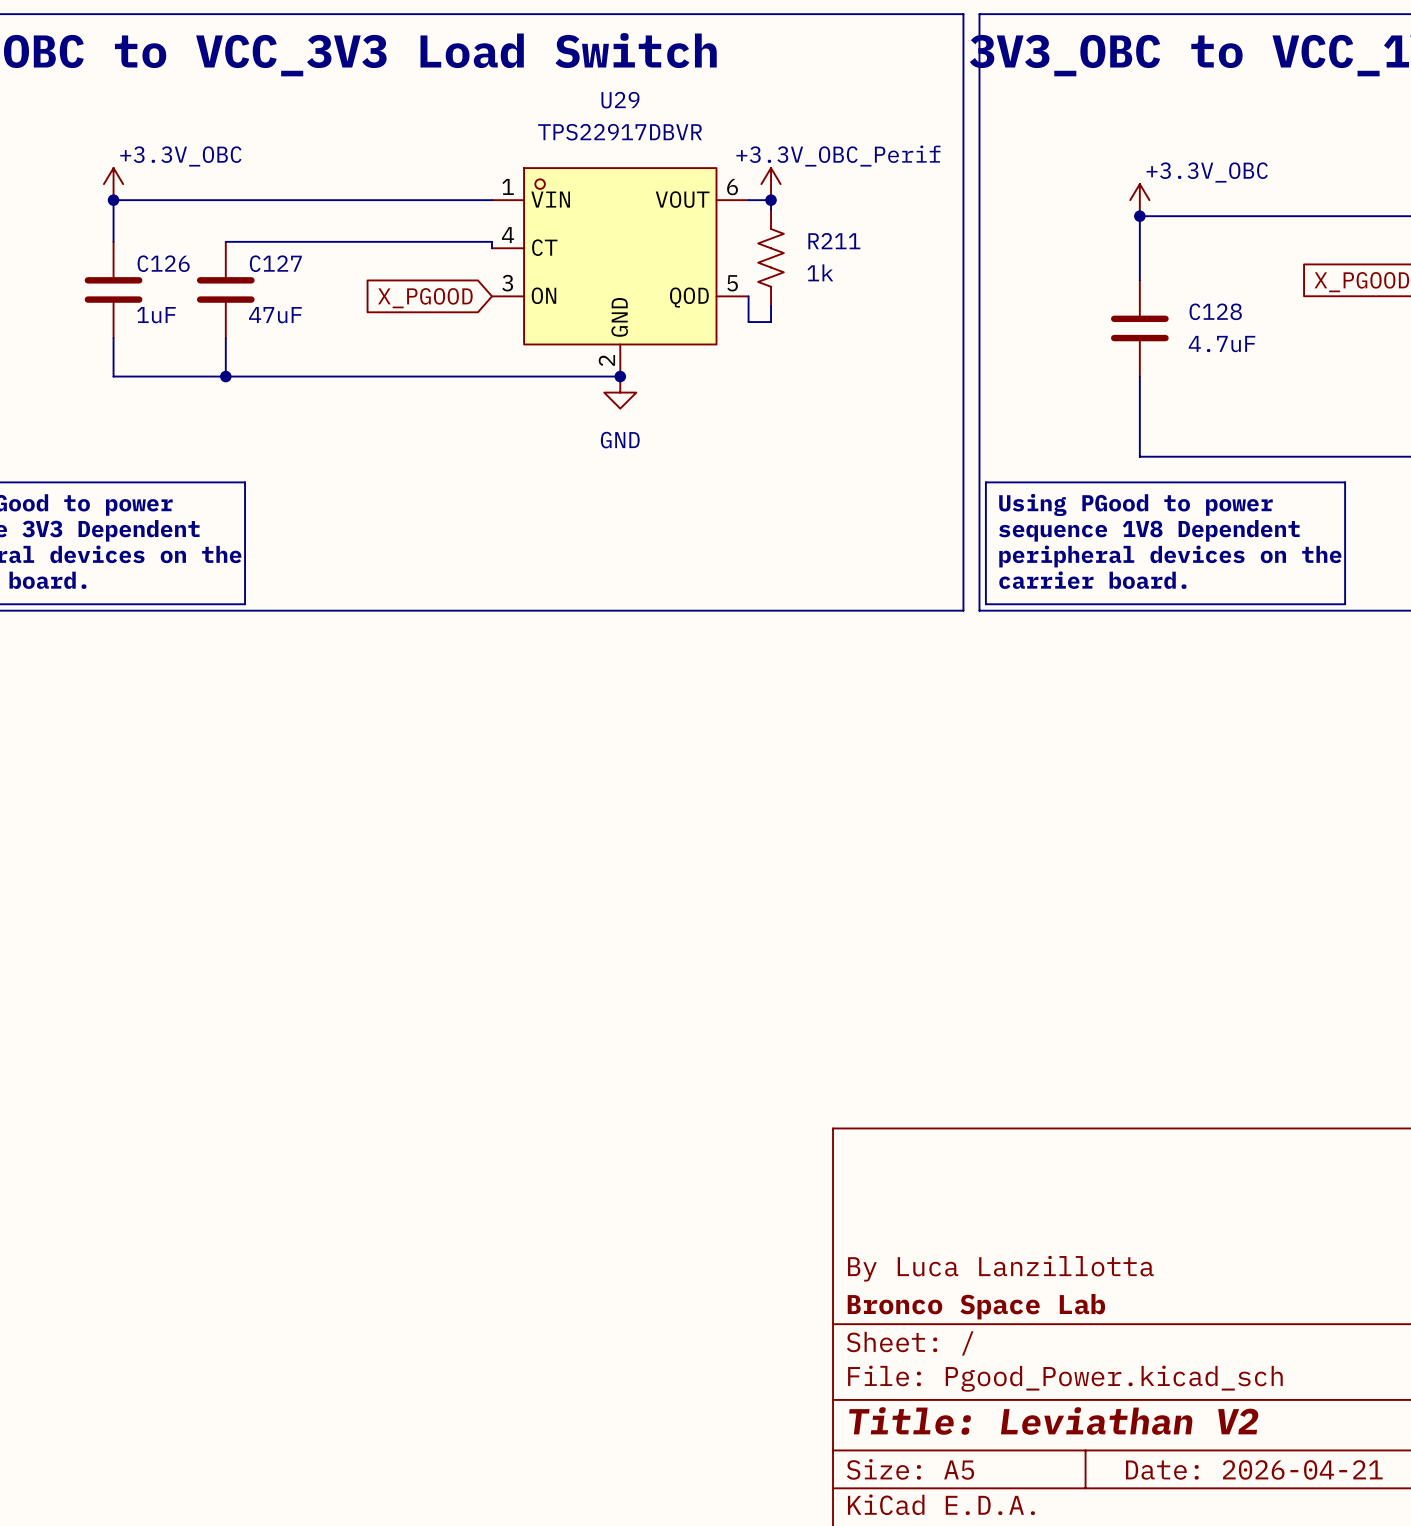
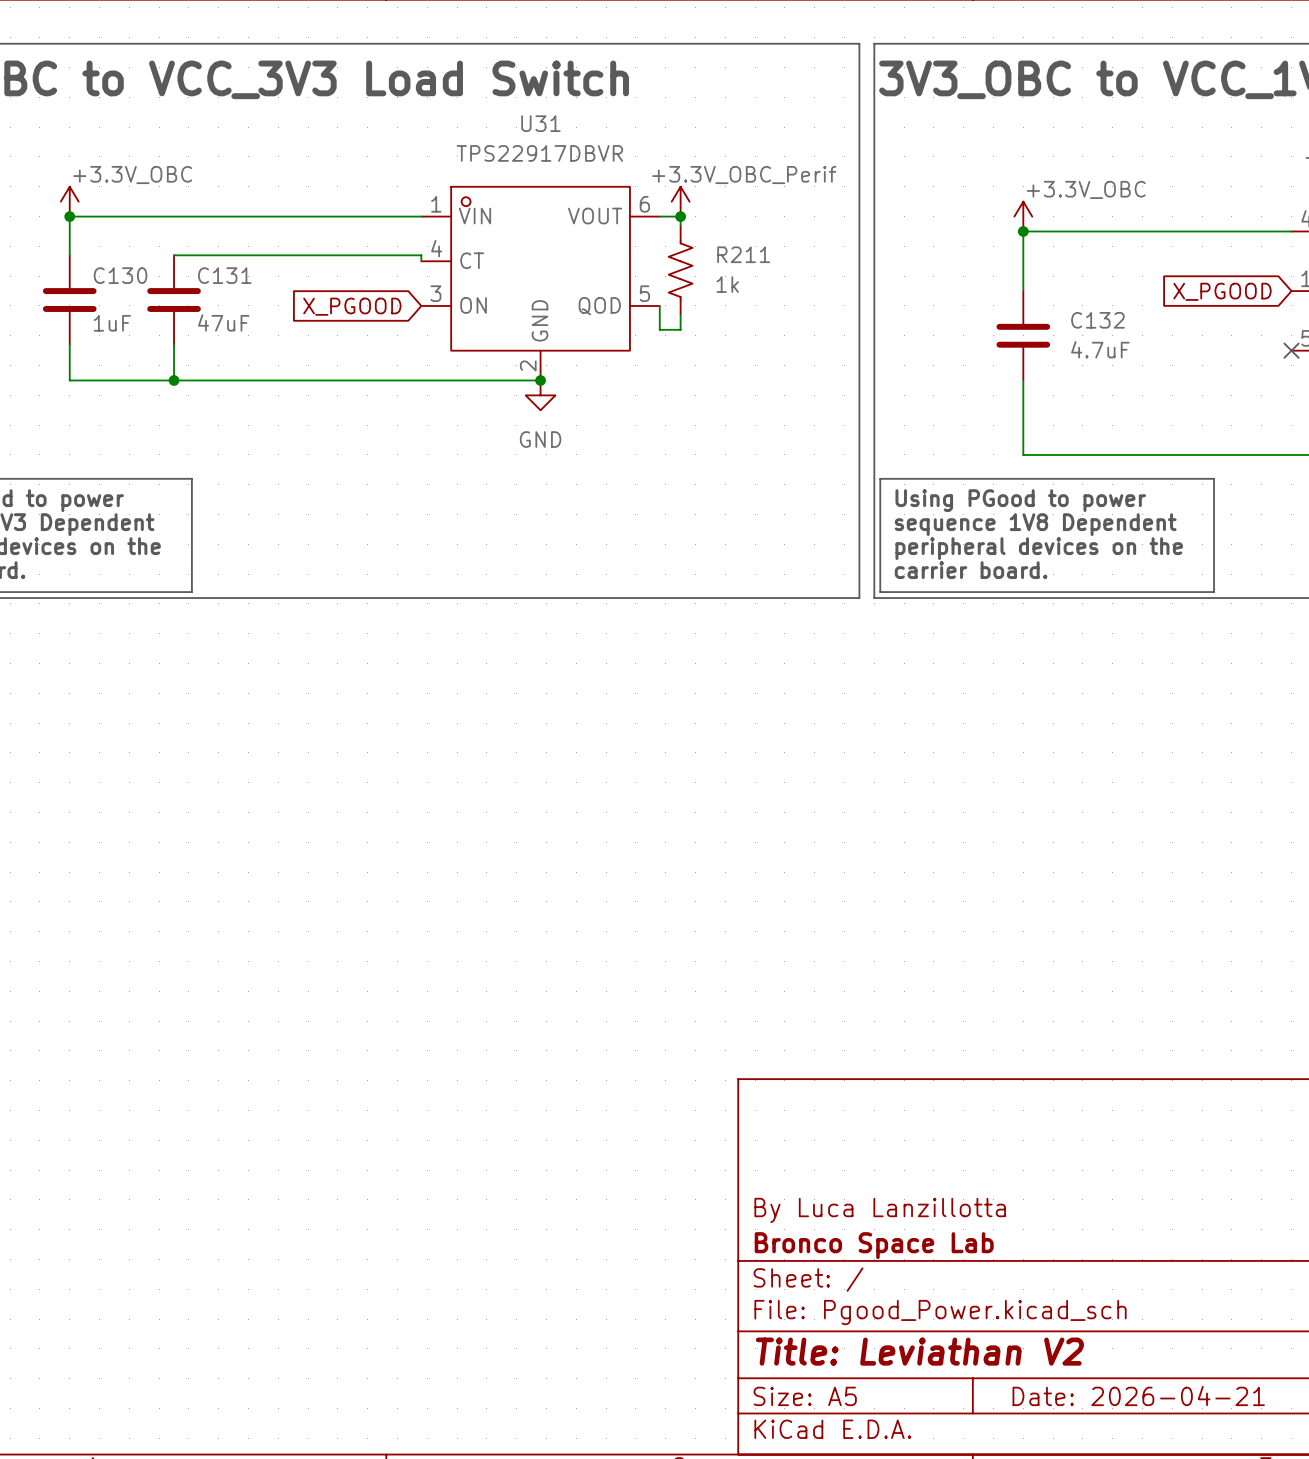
U29 name: U29 (620, 100) -> U31 (540, 123)
C126 name: C126 (163, 263) -> C130 (120, 275)
C127 name: C127 (275, 263) -> C131 (224, 275)
C128 name: C128 (1215, 311) -> C132 (1097, 320)

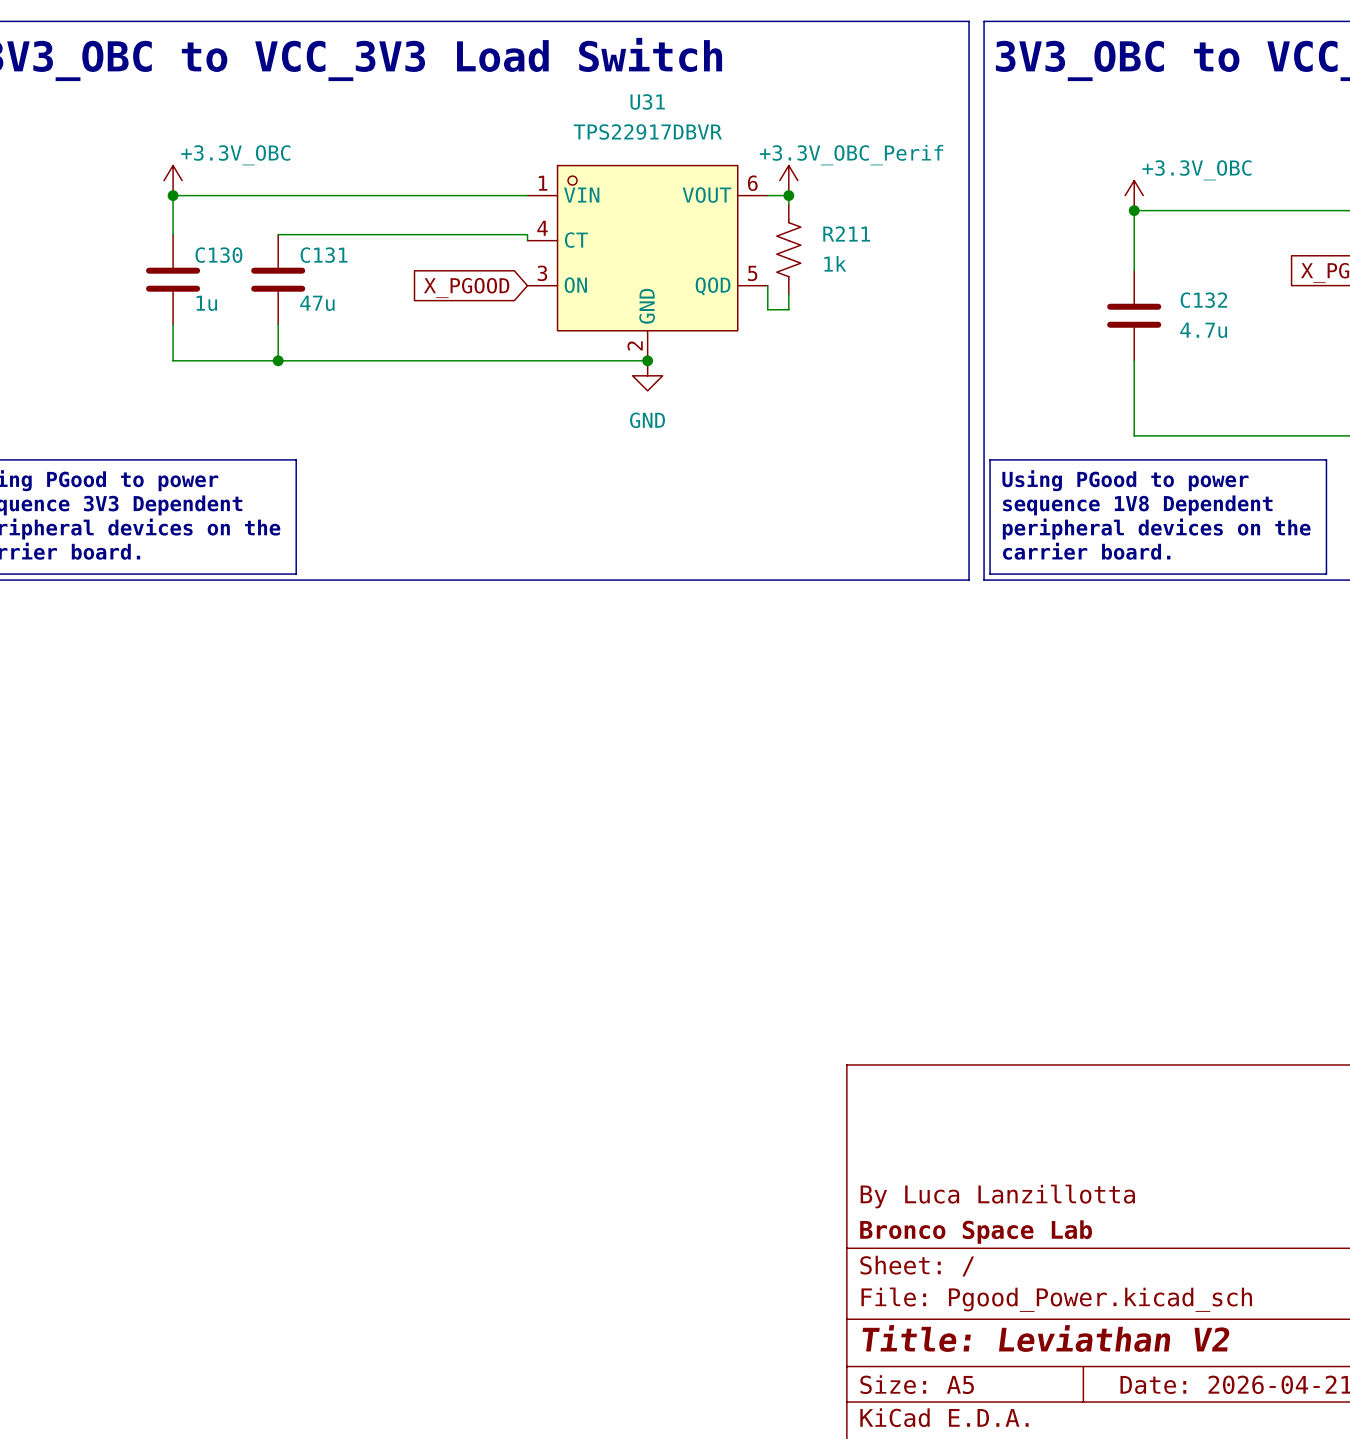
C131 value: 47uF (223, 322) -> 47u (317, 303)
C130 value: 1uF (112, 323) -> 1u (206, 303)
C132 value: 4.7uF (1100, 349) -> 4.7u (1203, 330)

